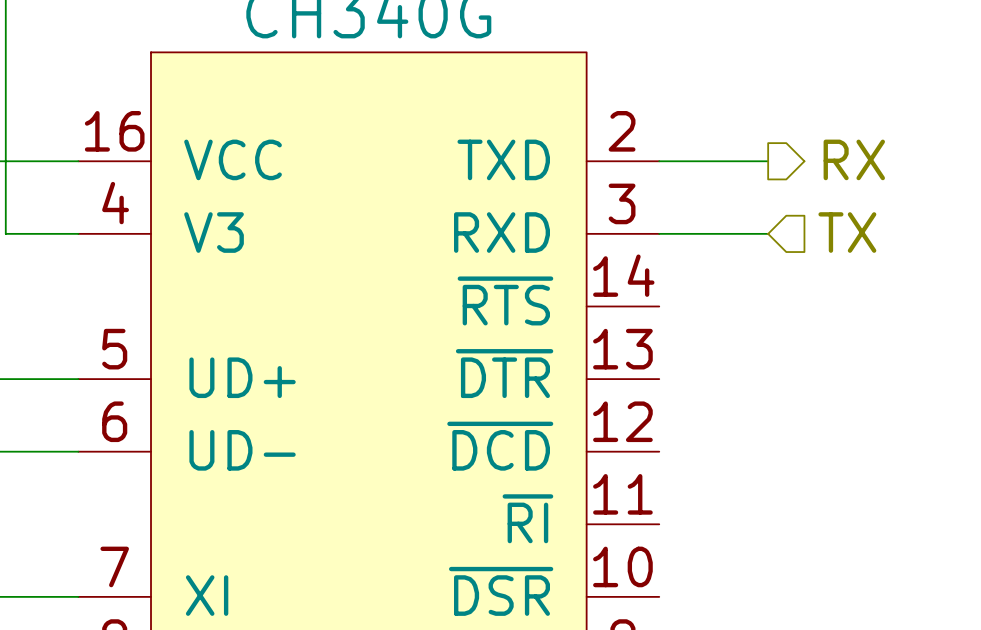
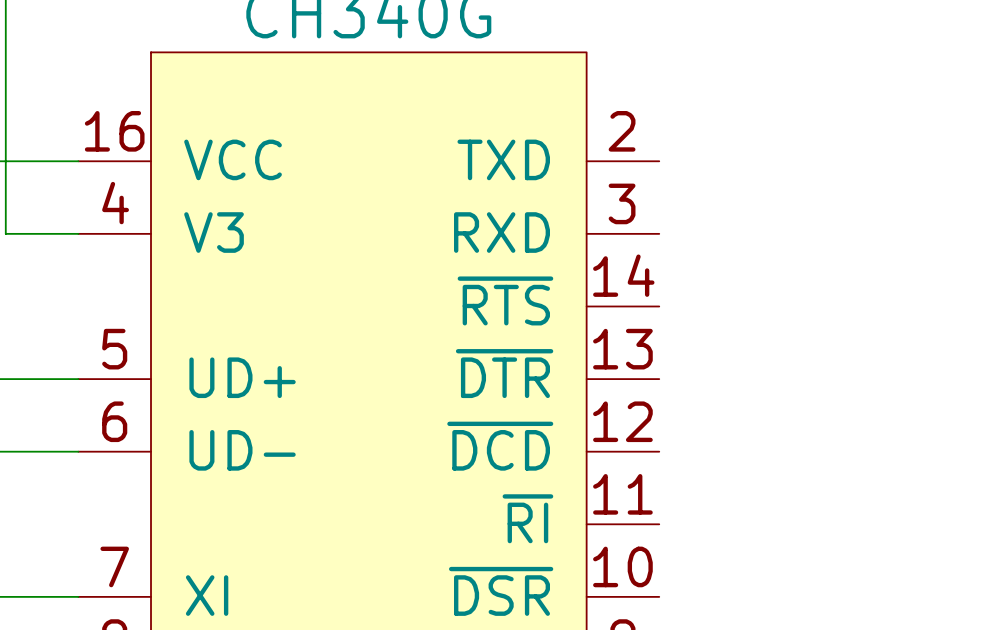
hierarchical label: RX (854, 159) -> none
wire: (659, 161) (768, 161) -> none
hierarchical label: TX (847, 232) -> none
wire: (659, 233) (768, 233) -> none

